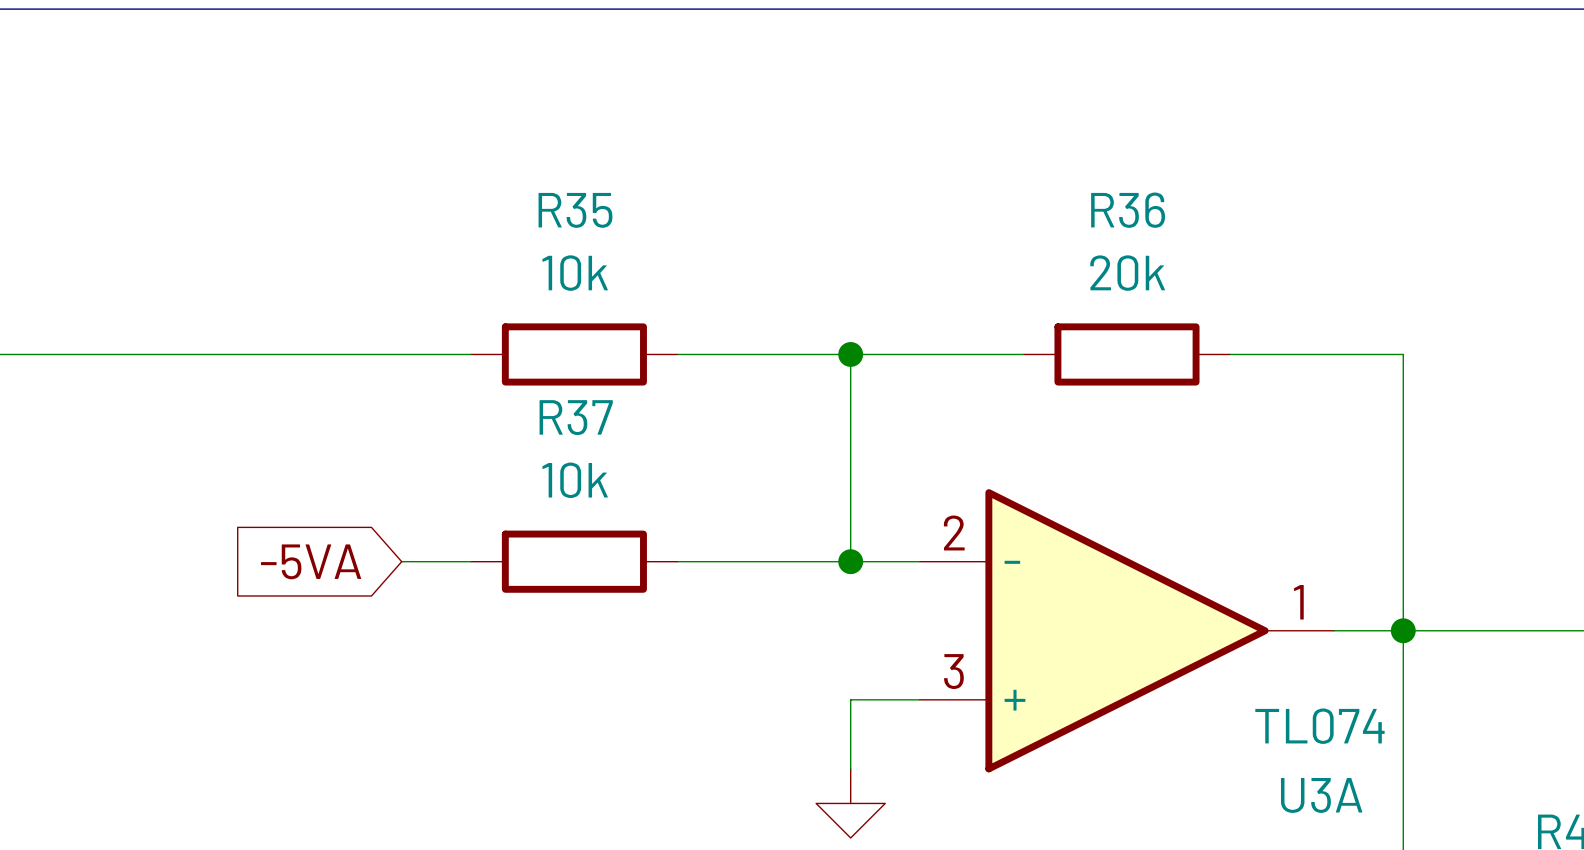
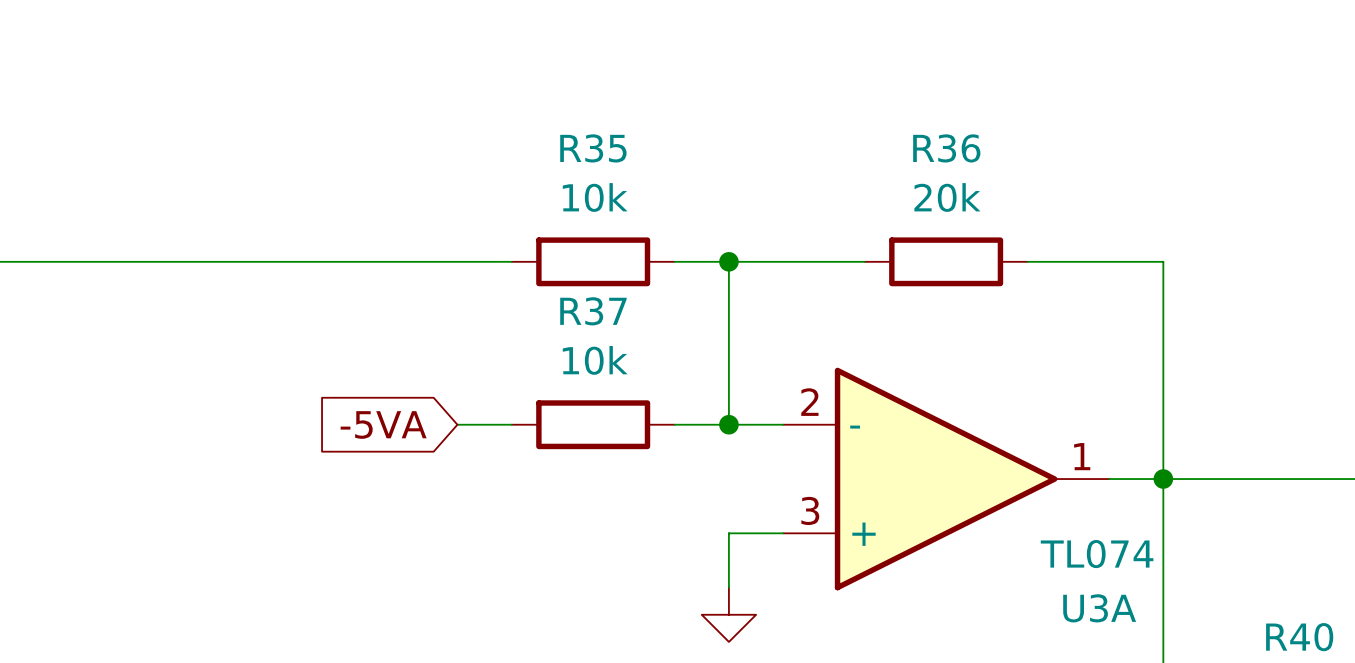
R35 position: (574, 354) -> (593, 261)
wire: (678, 354) (781, 354) -> (430, 261) (511, 261)
global label position: -5VA (311, 561) -> -5VA (383, 424)
wire: (401, 561) (470, 561) -> (457, 424) (511, 424)
R37 position: (574, 561) -> (593, 424)
wire: (678, 561) (781, 561) -> none

